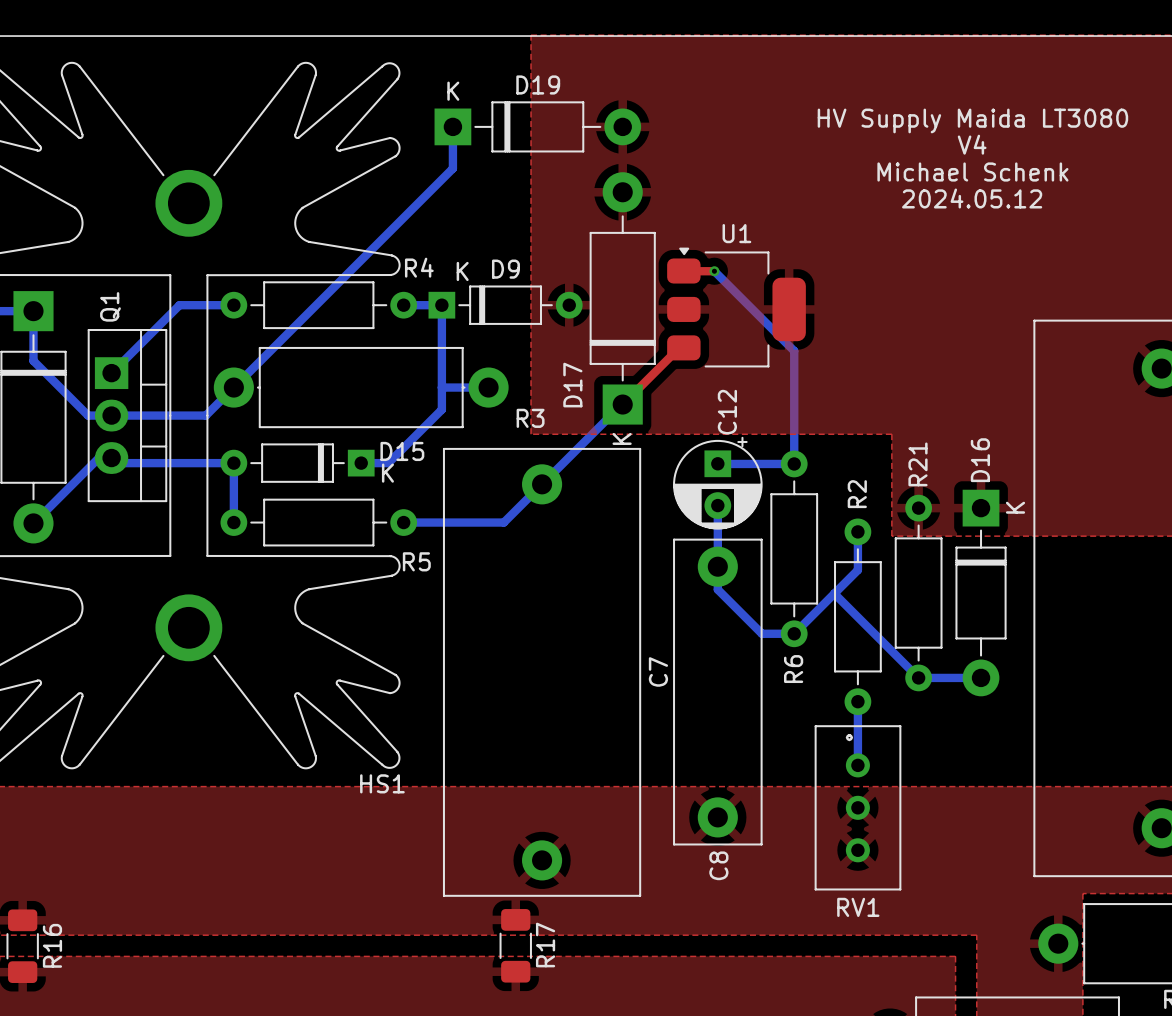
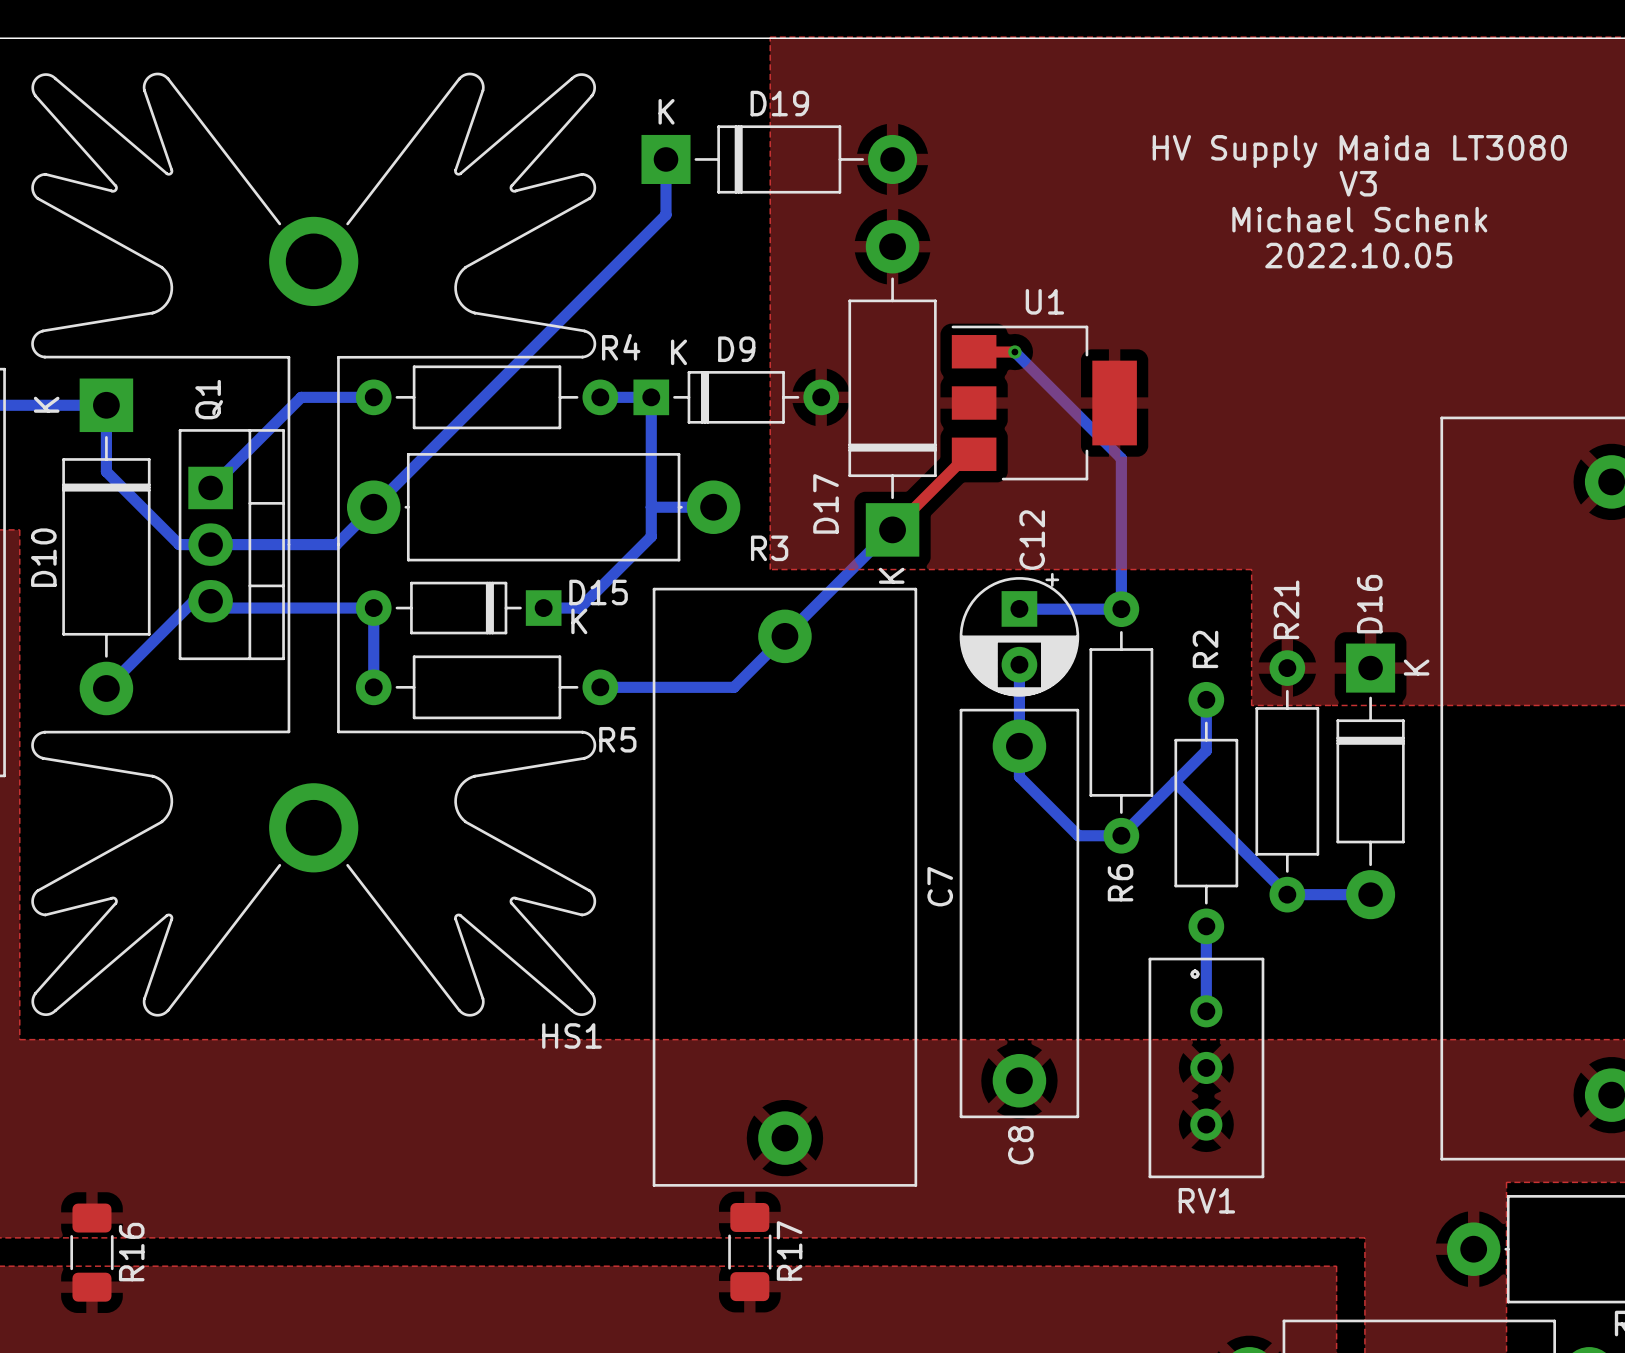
text: V4 (972, 144) -> V3 (1358, 183)
text: 2024.05.12 (972, 198) -> 2022.10.05 (1358, 255)
U1 footprint: [667, 247, 806, 368] -> [951, 325, 1137, 481]

